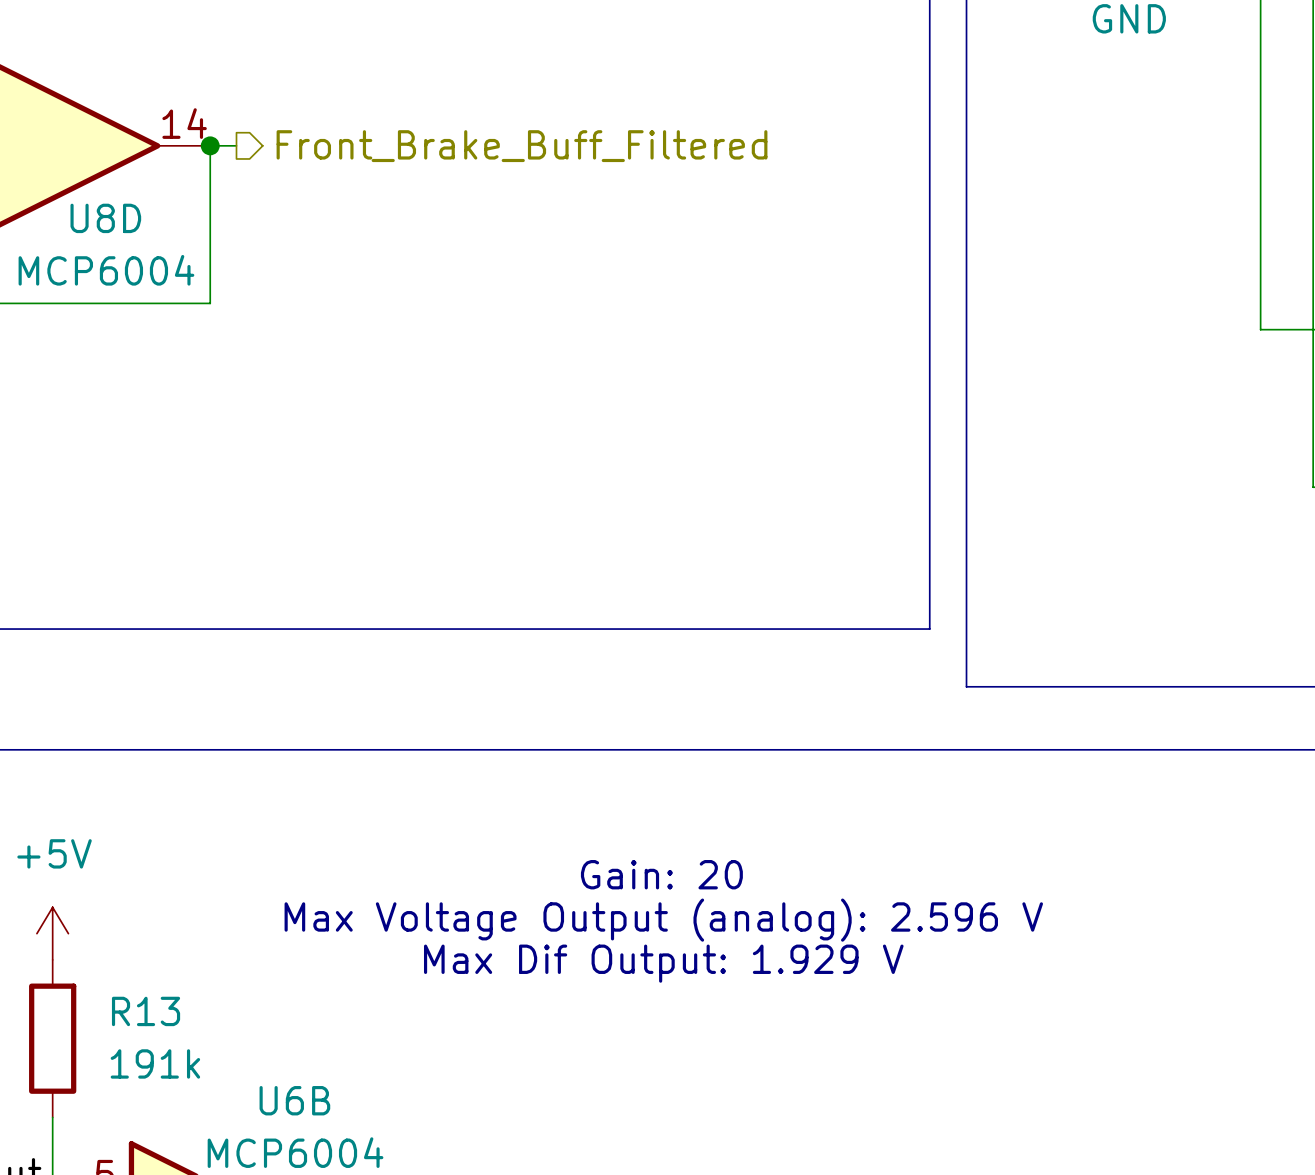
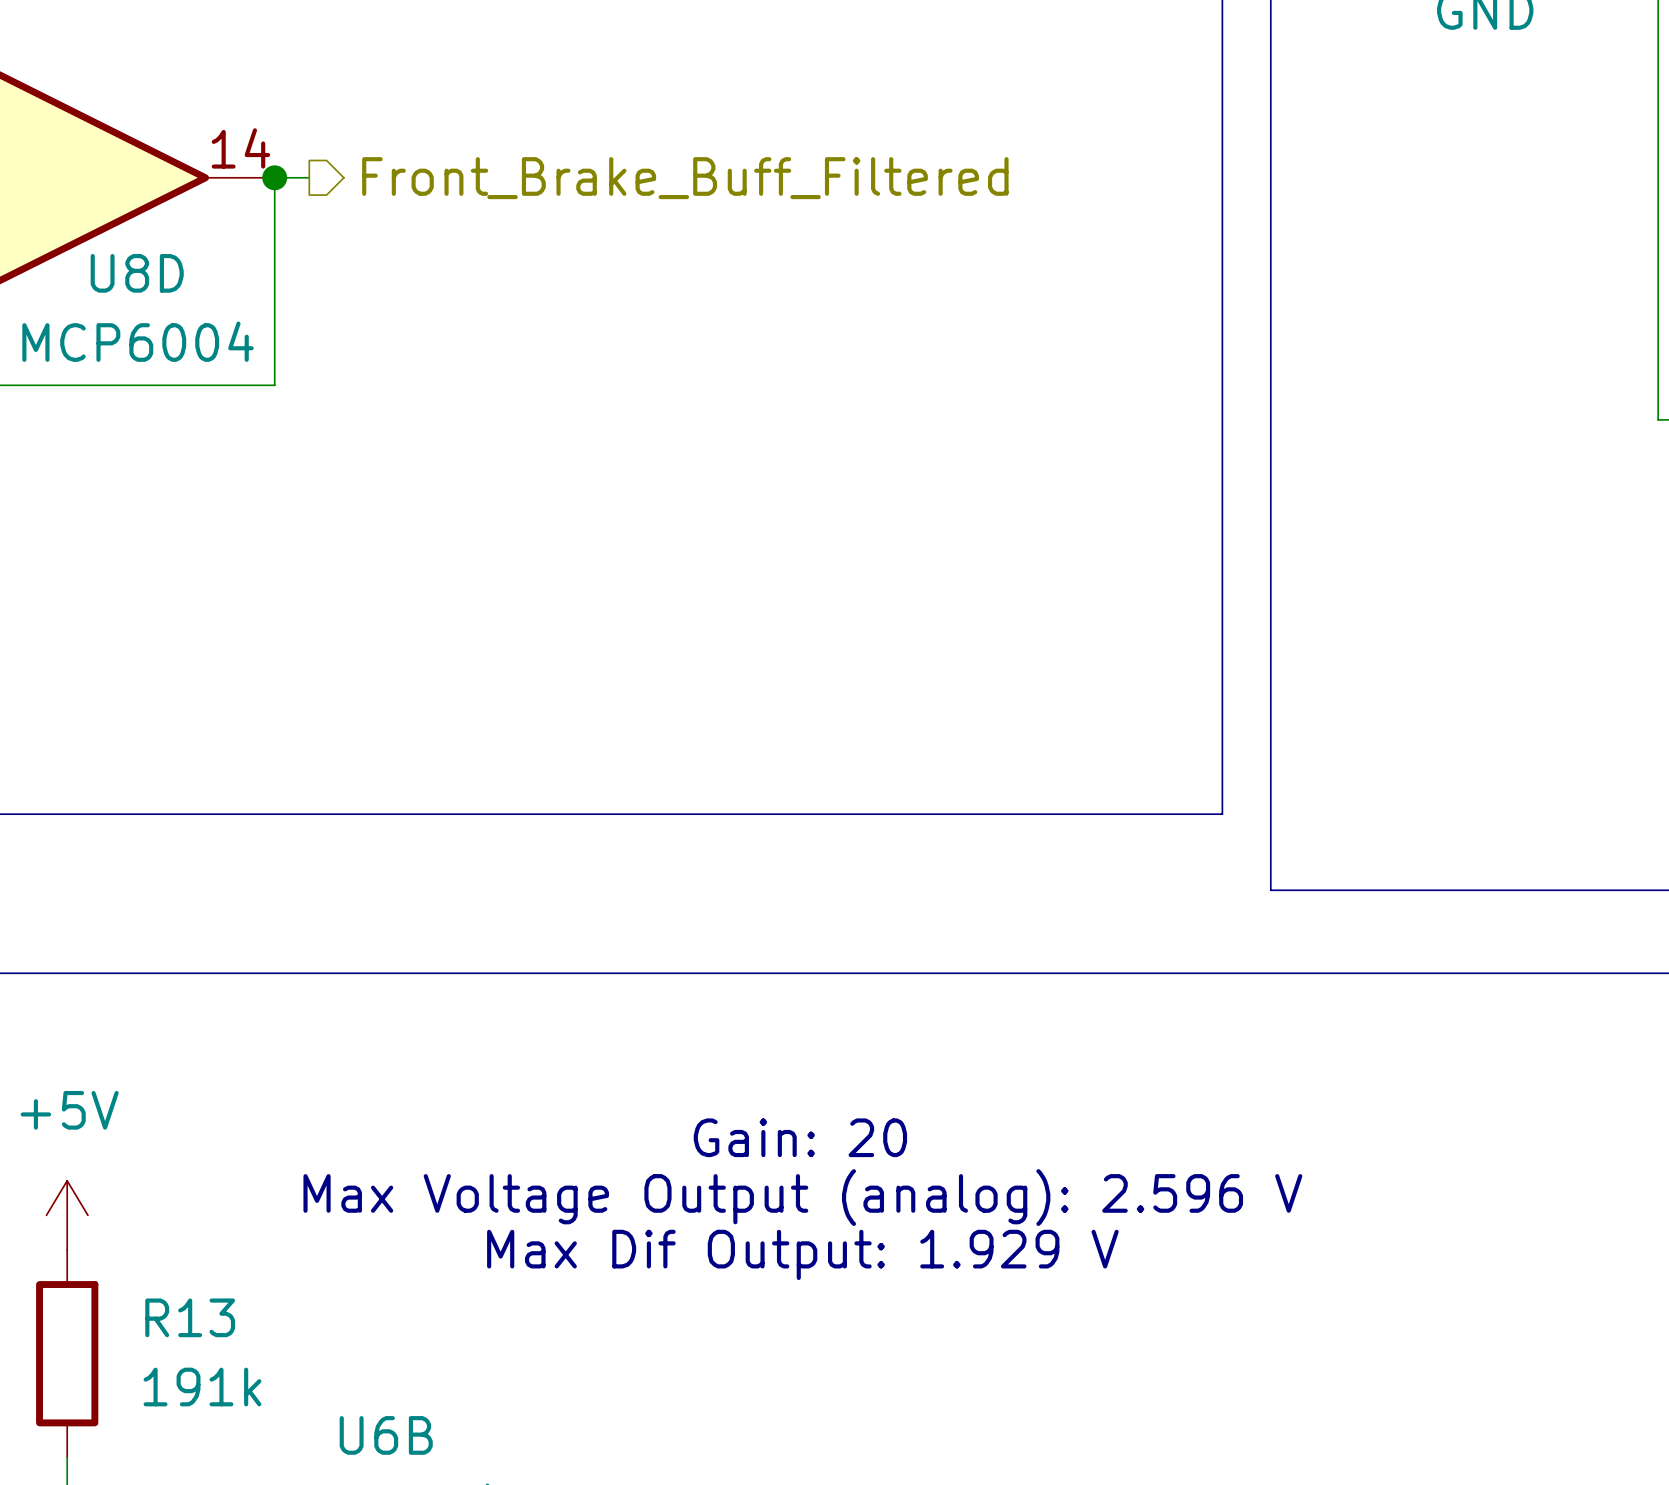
text position: Gain: 20 (661, 874) -> Gain: 20 (800, 1137)
text position: Max Voltage Output (analog): 2.596 V (663, 920) -> Max Voltage Output (analog): 2.596 V (802, 1197)
text position: Max Dif Output: 1.929 V (663, 963) -> Max Dif Output: 1.929 V (802, 1254)

